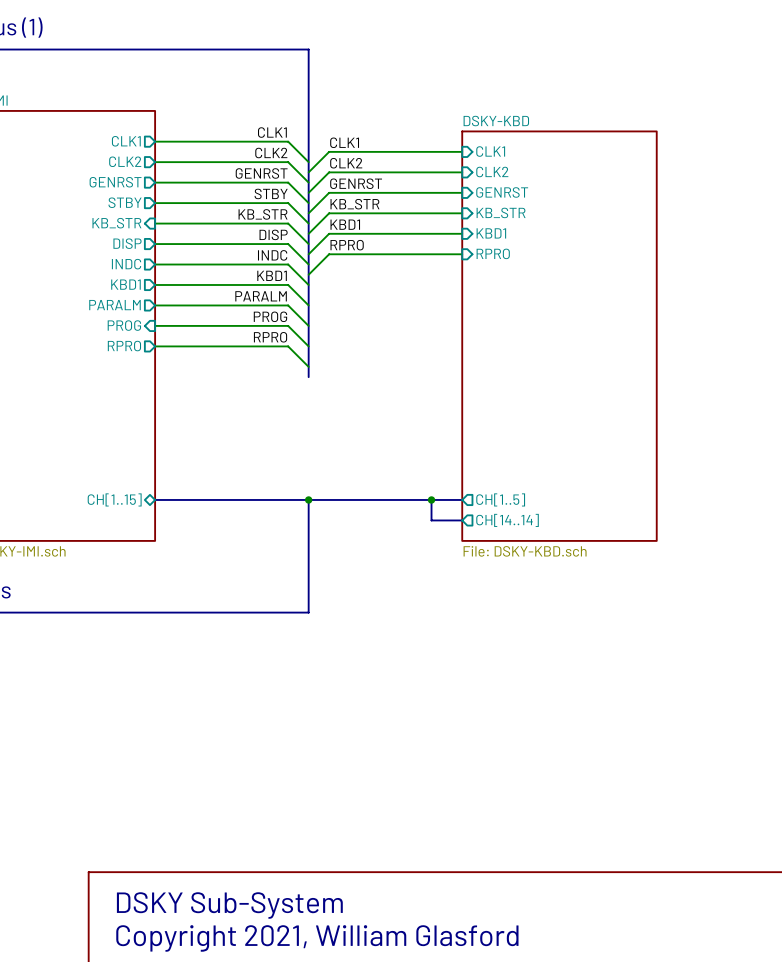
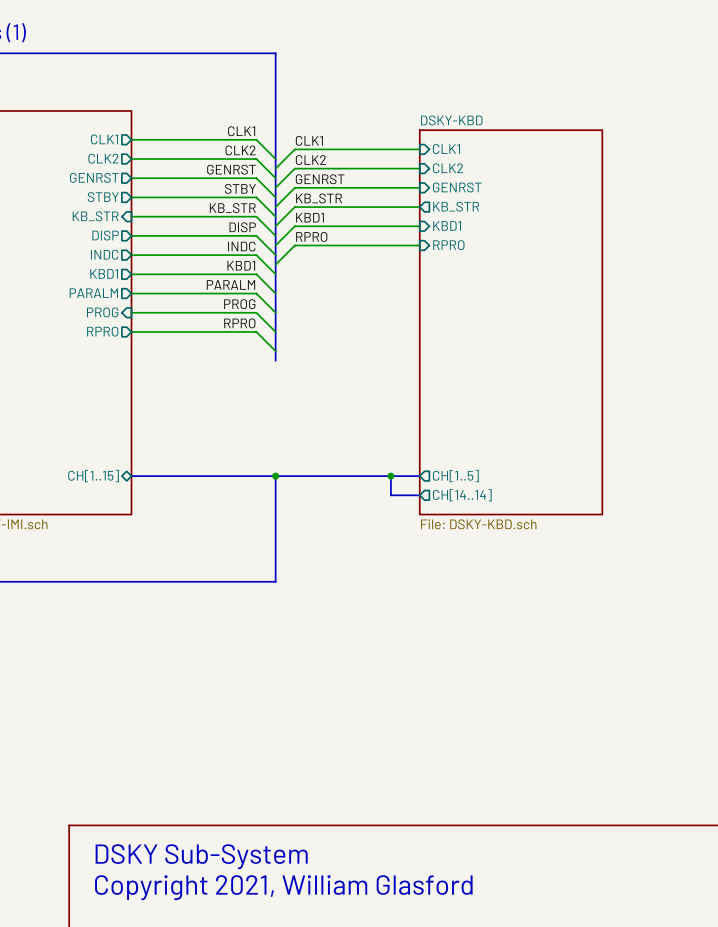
sheet pin shape: input (501, 212) -> output (456, 206)

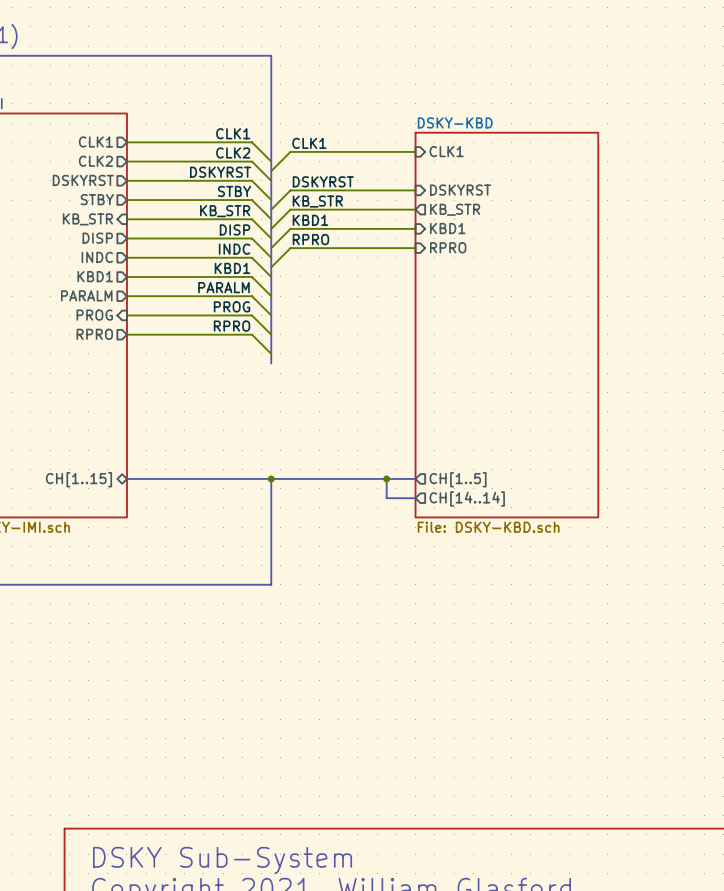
label: CLK2 (310, 160) -> none
wire: (419, 168) (294, 168) (275, 187) -> none
sheet pin: CLK2 (448, 168) -> none
label: GENRST (231, 169) -> DSKYRST (220, 172)
sheet pin: GENRST (94, 177) -> DSKYRST (83, 180)
label: GENRST (320, 179) -> DSKYRST (323, 181)
sheet pin: GENRST (457, 187) -> DSKYRST (460, 190)

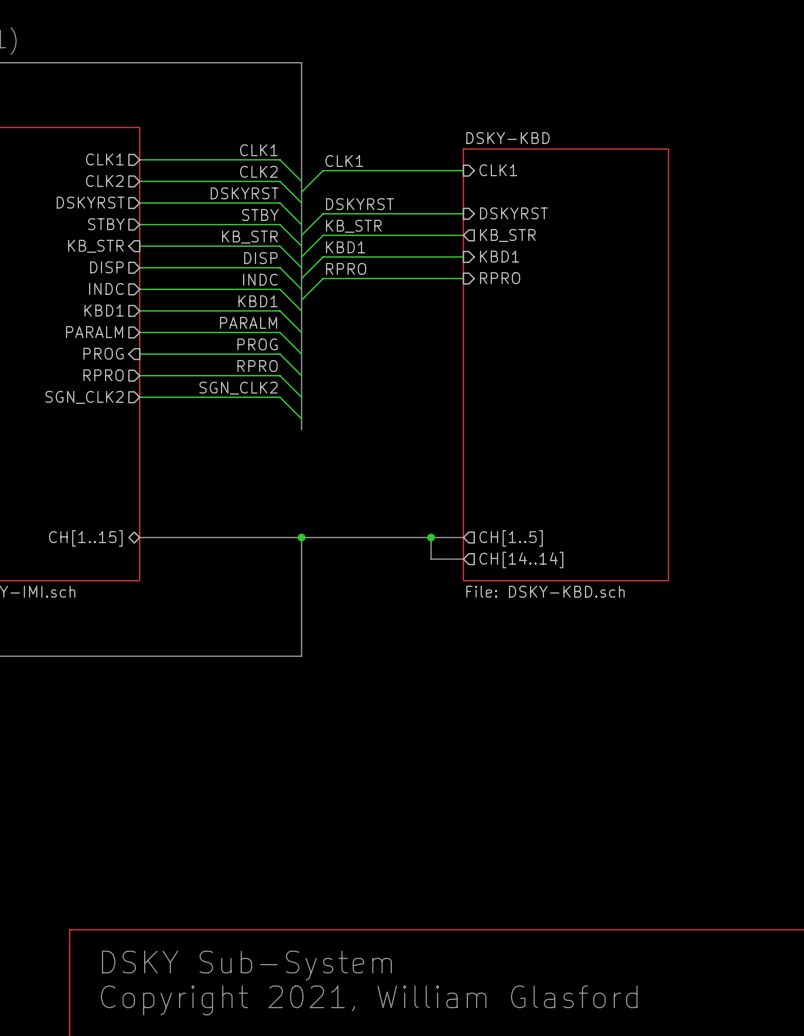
label: none -> SGN_CLK2 (238, 388)
wire: none -> (139, 397) (279, 397) (301, 418)
sheet pin: none -> SGN_CLK2 (84, 397)
bus: none -> (301, 408) (301, 429)

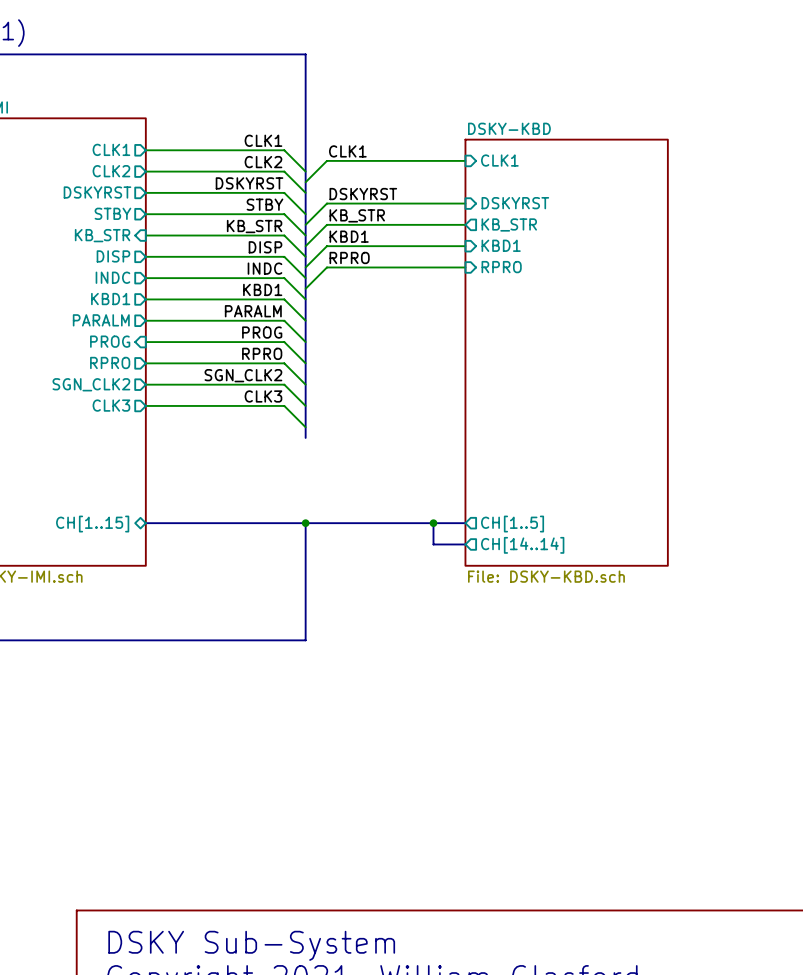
label: none -> CLK3 (263, 396)
sheet pin: none -> CLK3 (111, 405)
wire: none -> (145, 405) (284, 405) (305, 427)
bus: none -> (305, 416) (305, 437)

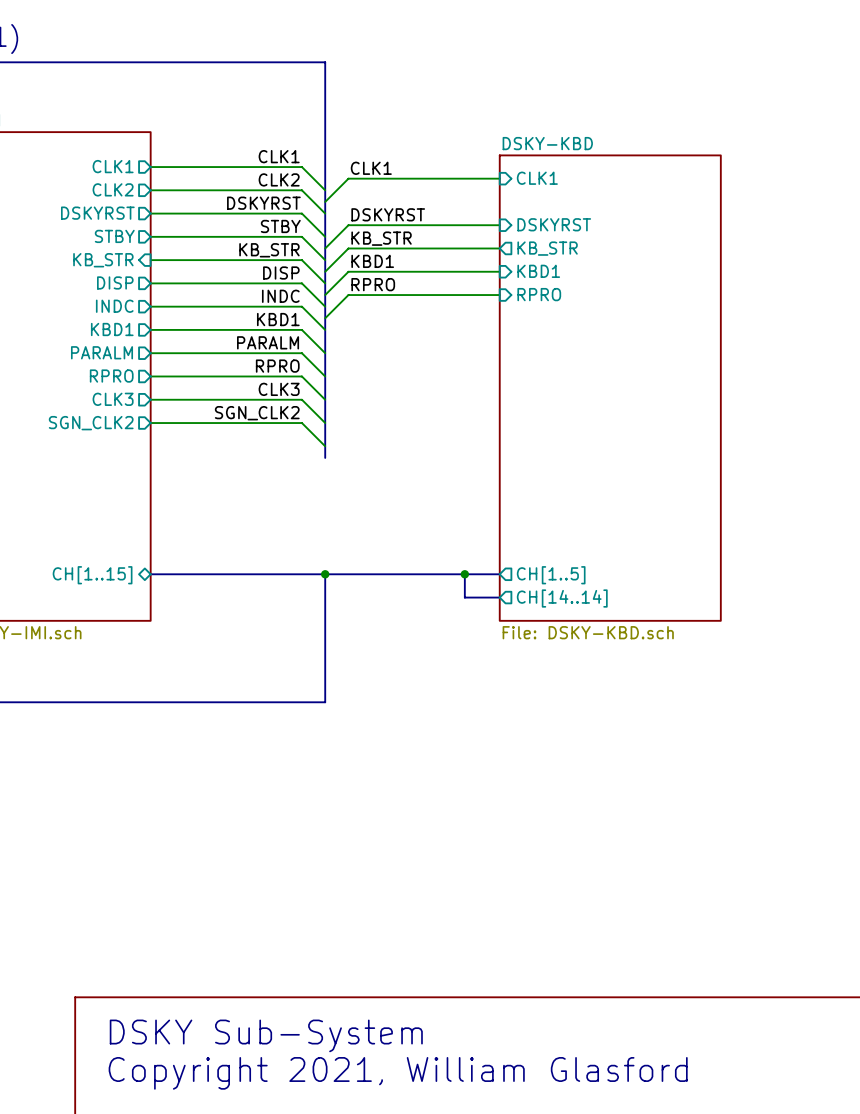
label: PROG (262, 332) -> RPRO (277, 366)
sheet pin shape: input (110, 341) -> output (111, 376)
sheet pin: PROG (110, 341) -> RPRO (111, 376)
label: RPRO (262, 353) -> CLK3 (279, 389)
sheet pin: RPRO (110, 362) -> CLK3 (113, 399)
label: CLK3 (263, 396) -> none
sheet pin: CLK3 (111, 405) -> none
wire: (145, 405) (284, 405) (305, 427) -> none
bus: (305, 416) (305, 437) -> none

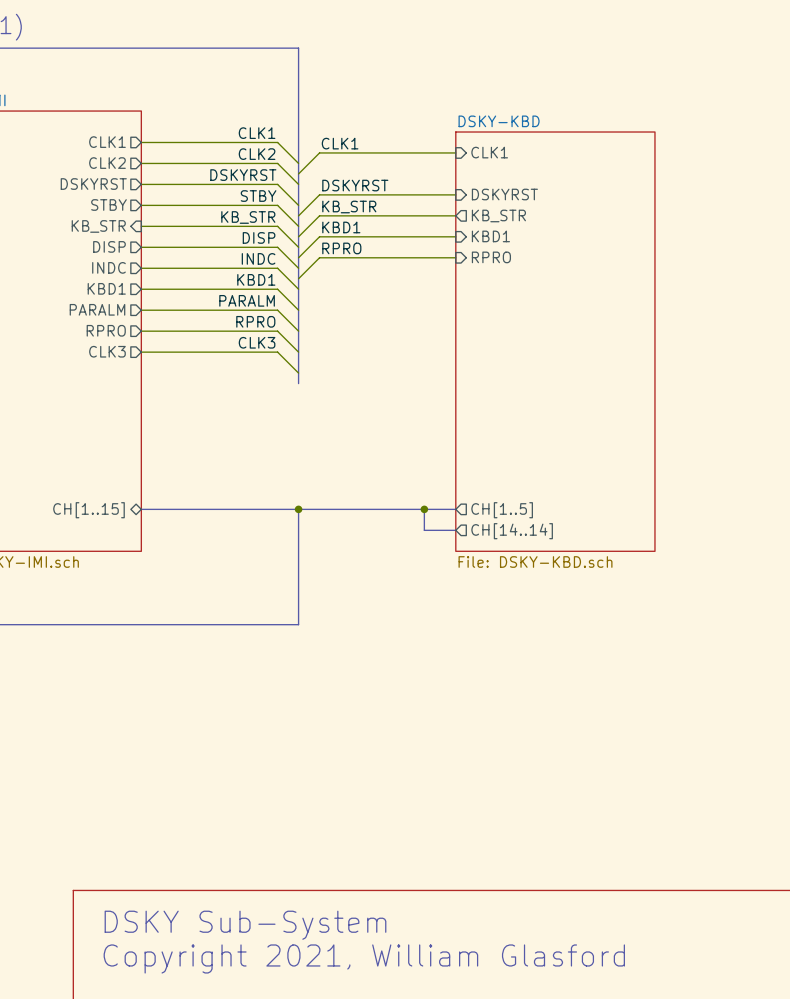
label: SGN_CLK2 (257, 413) -> none
sheet pin: SGN_CLK2 (91, 423) -> none
wire: (150, 423) (301, 423) (325, 446) -> none
bus: (325, 434) (325, 457) -> none

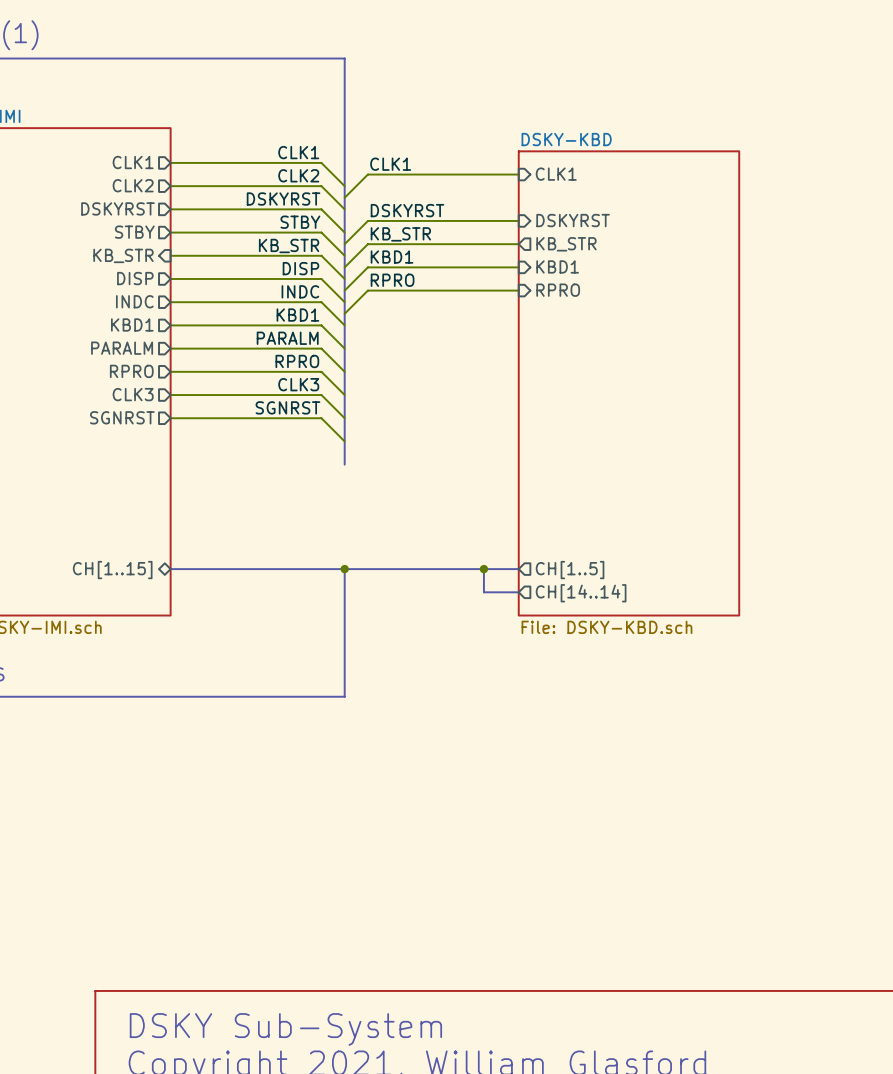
label: none -> SGNRST (287, 407)
sheet pin: none -> SGNRST (122, 417)
wire: none -> (170, 418) (321, 418) (344, 441)
bus: none -> (344, 429) (344, 464)

